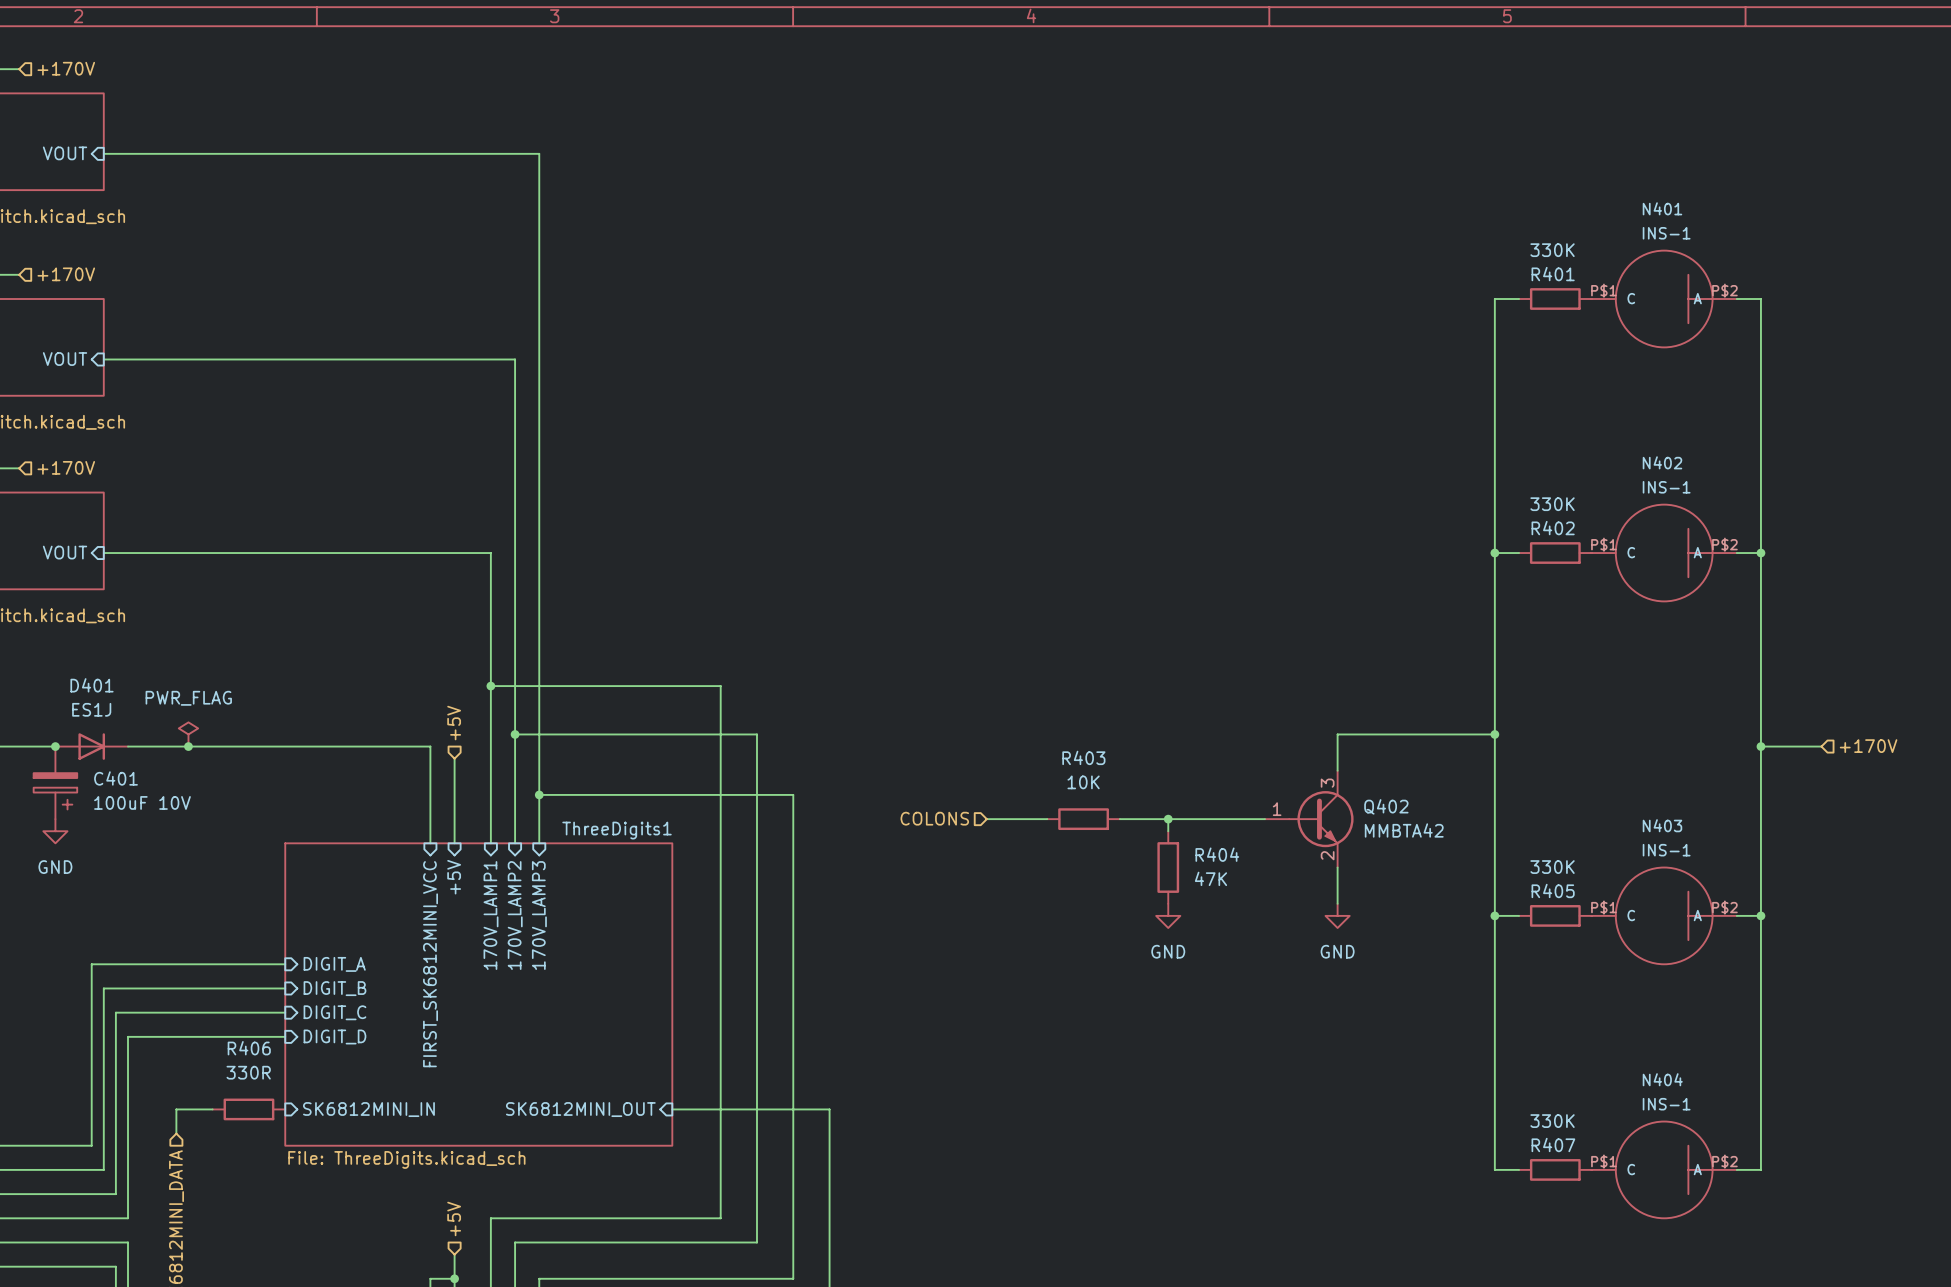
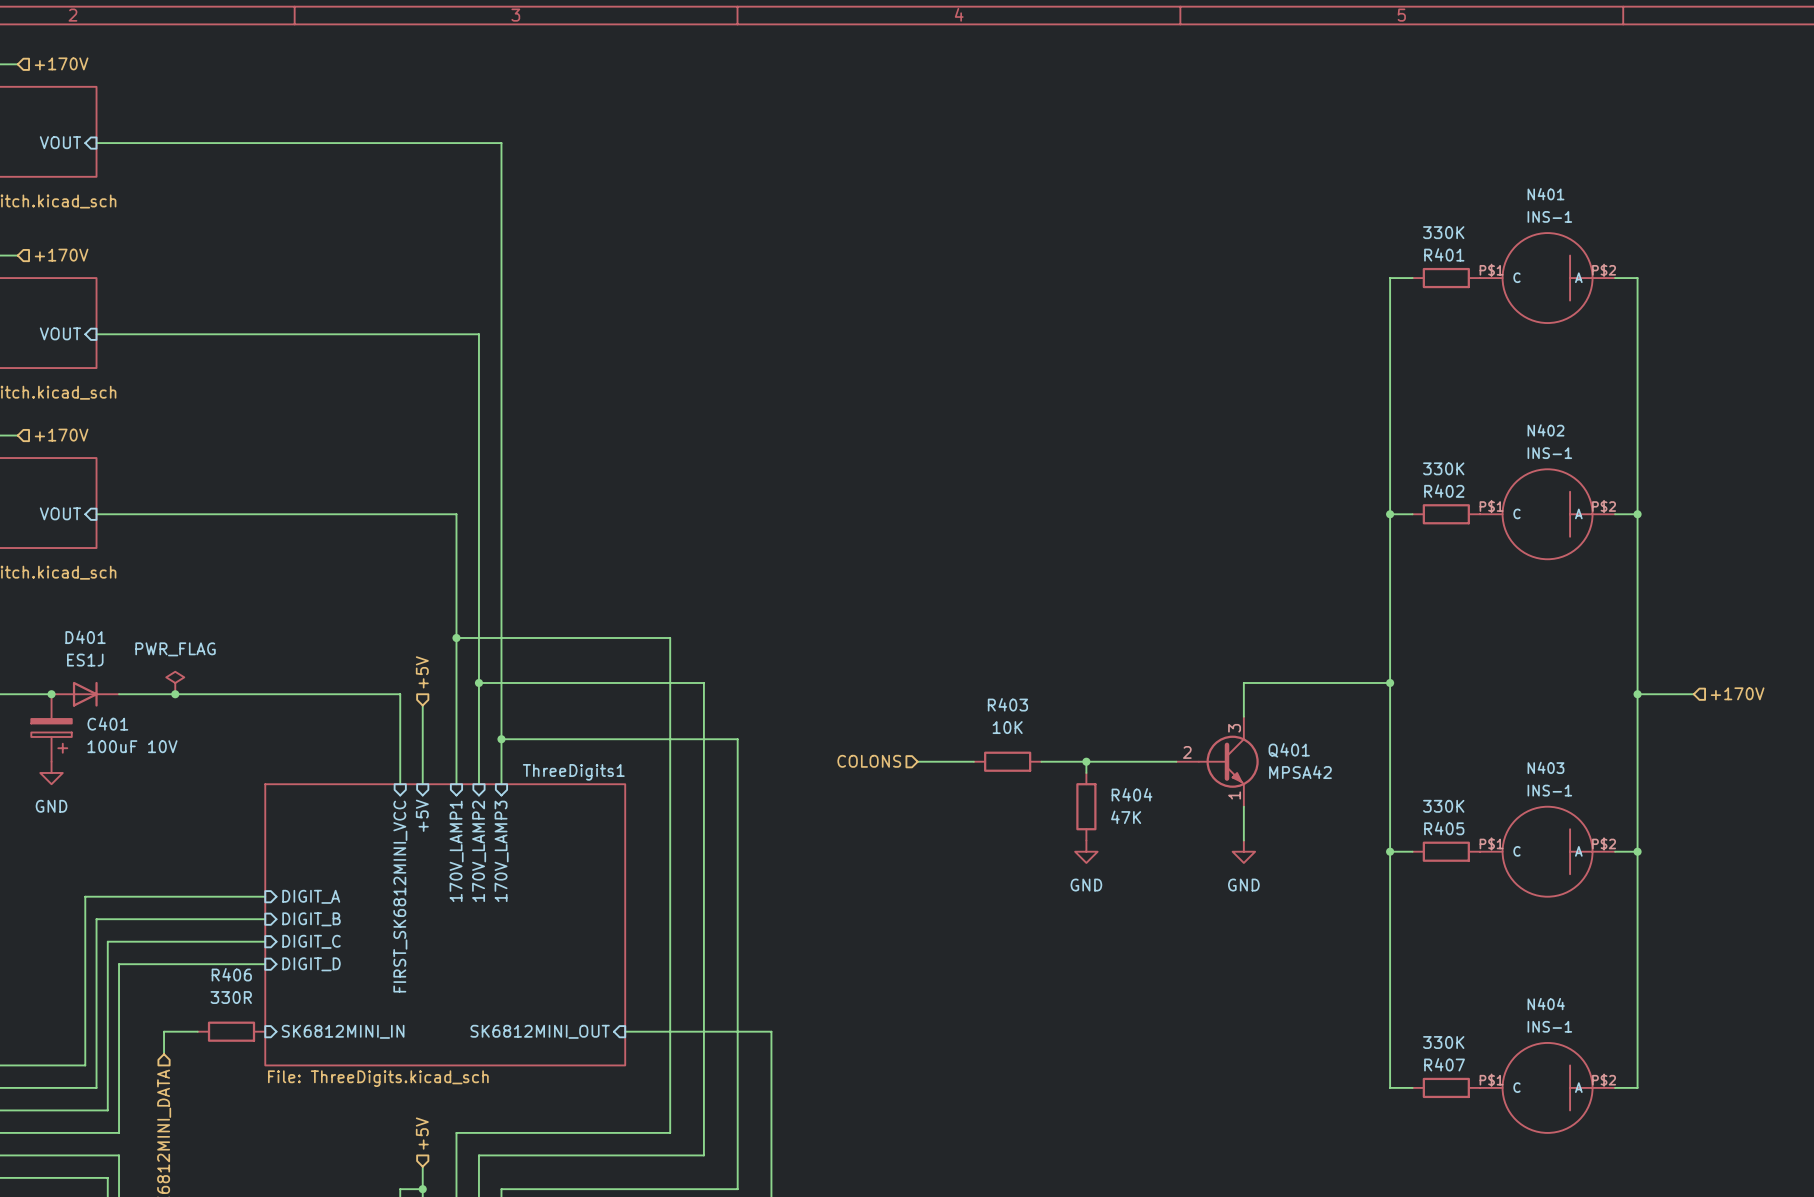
Q402 name: Q402 (1386, 806) -> Q401 (1289, 750)
Q402 pin number: 1 (1277, 809) -> 2 (1187, 752)
Q402 value: MMBTA42 (1404, 830) -> MPSA42 (1300, 772)
Q402 pin number: 2 (1327, 855) -> 1 (1234, 795)

